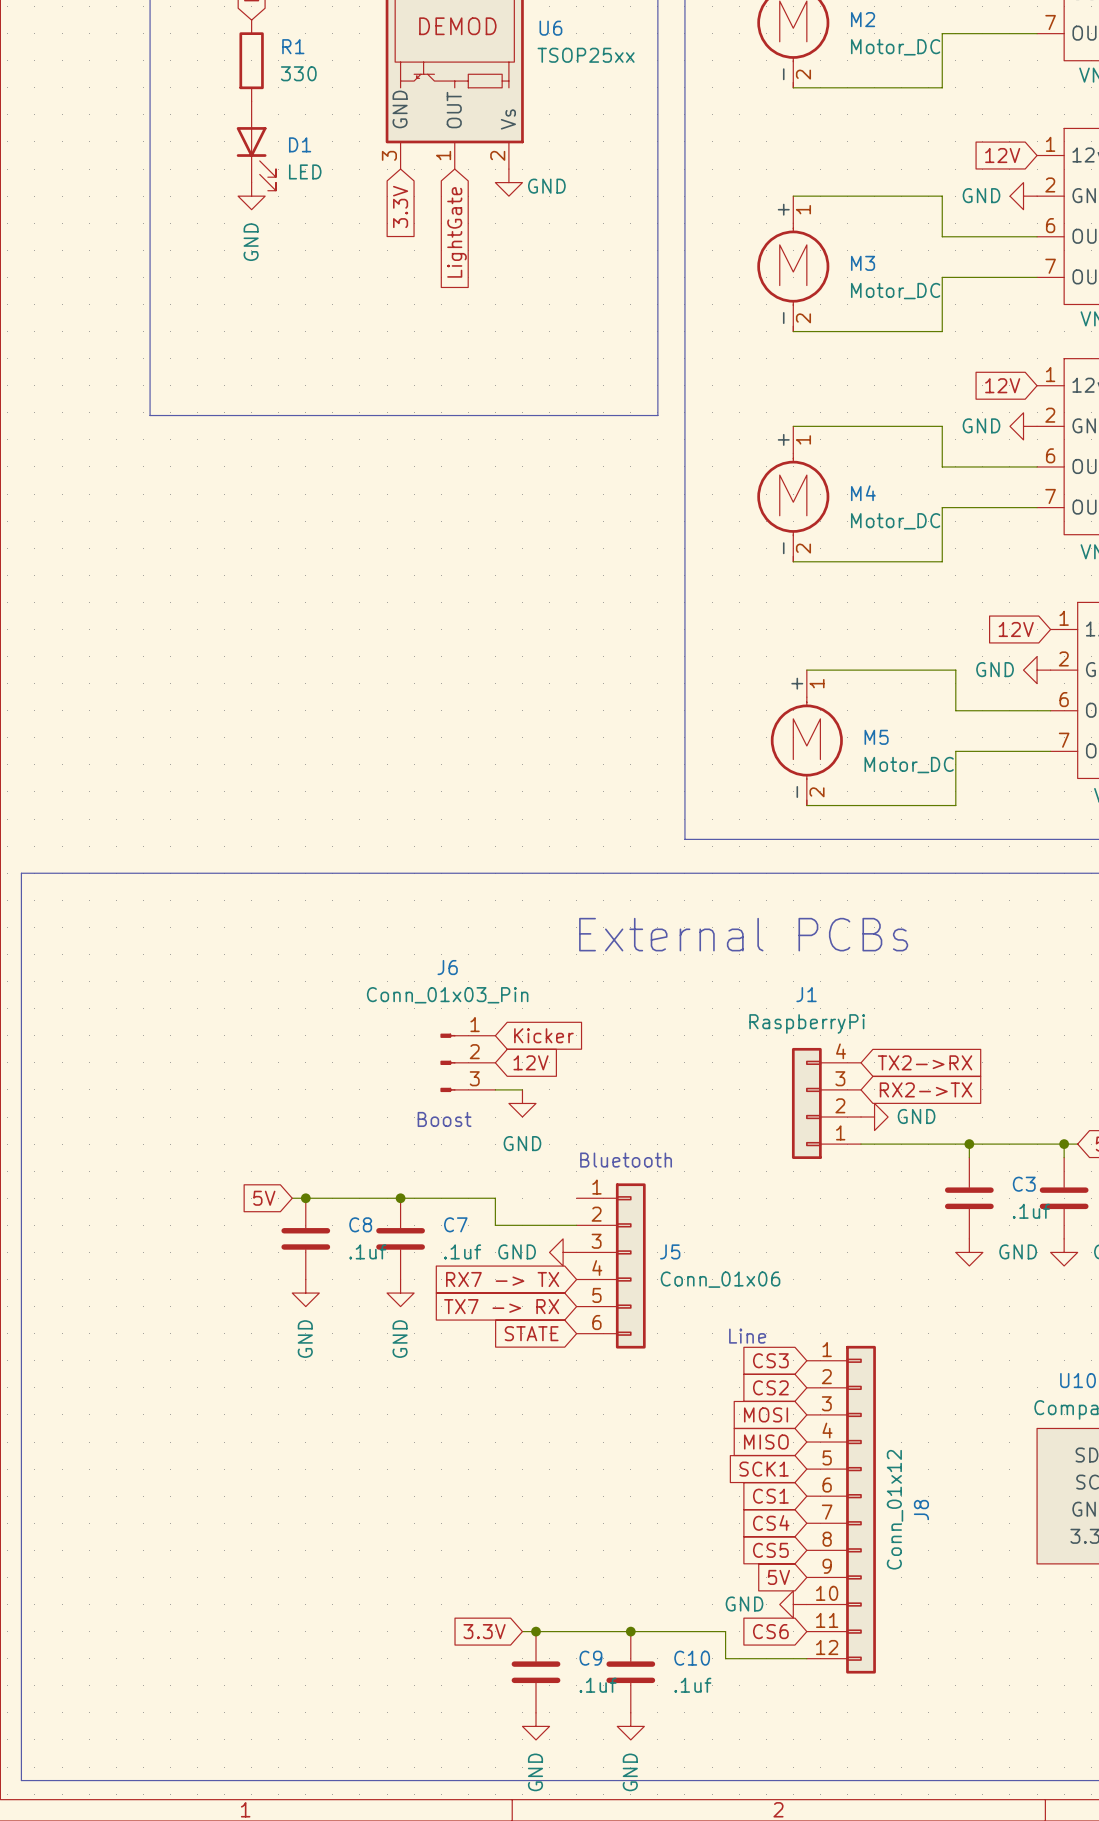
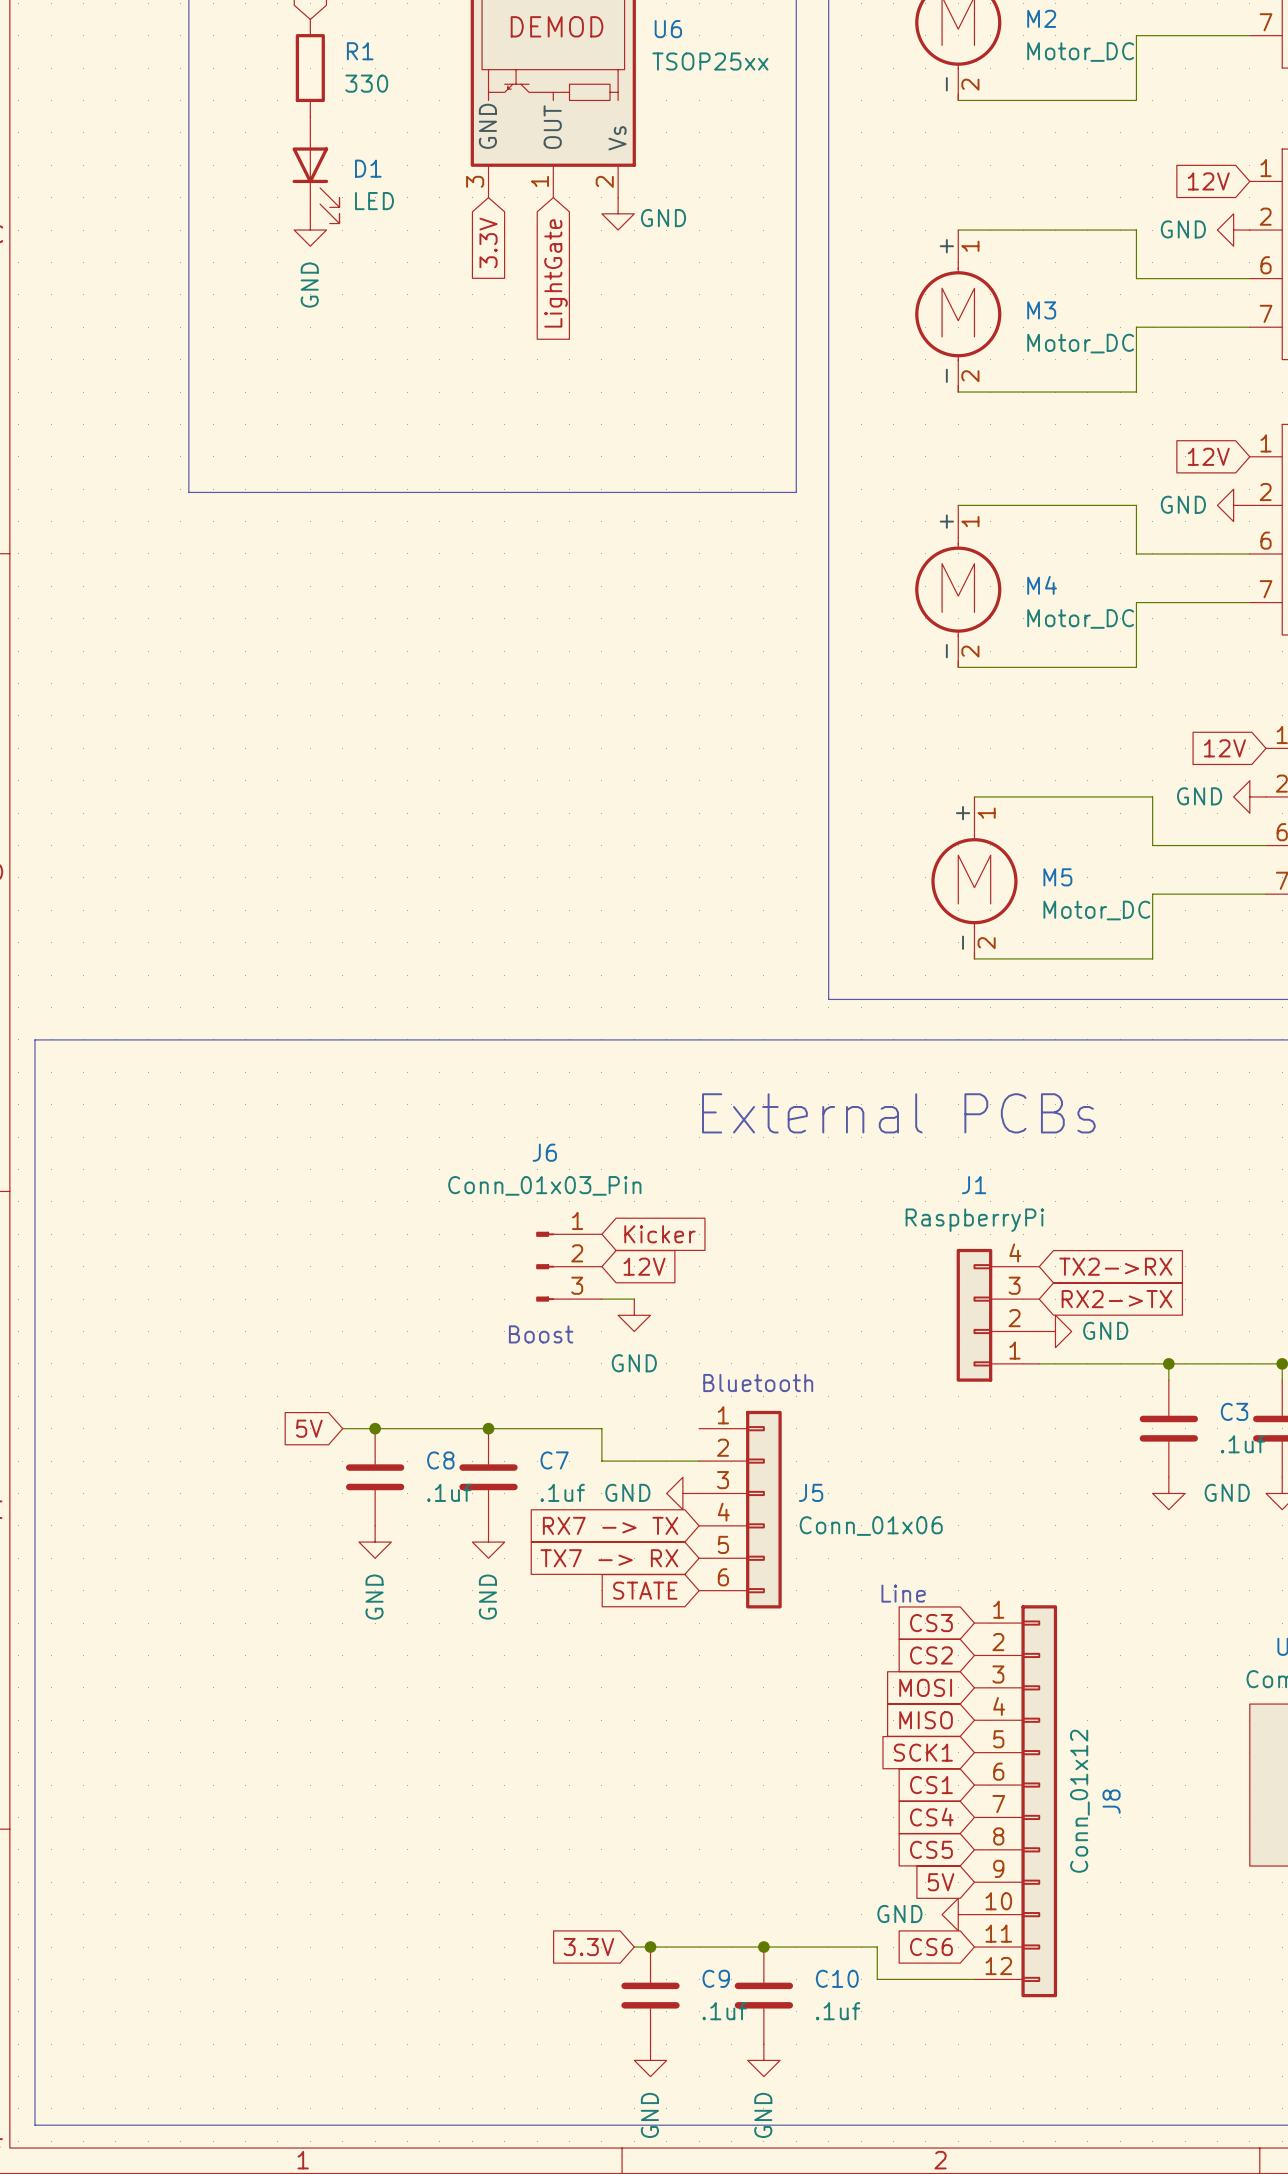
global label position: 5V (264, 1198) -> 5V (309, 1428)
wire: none -> (342, 1428) (358, 1428)

